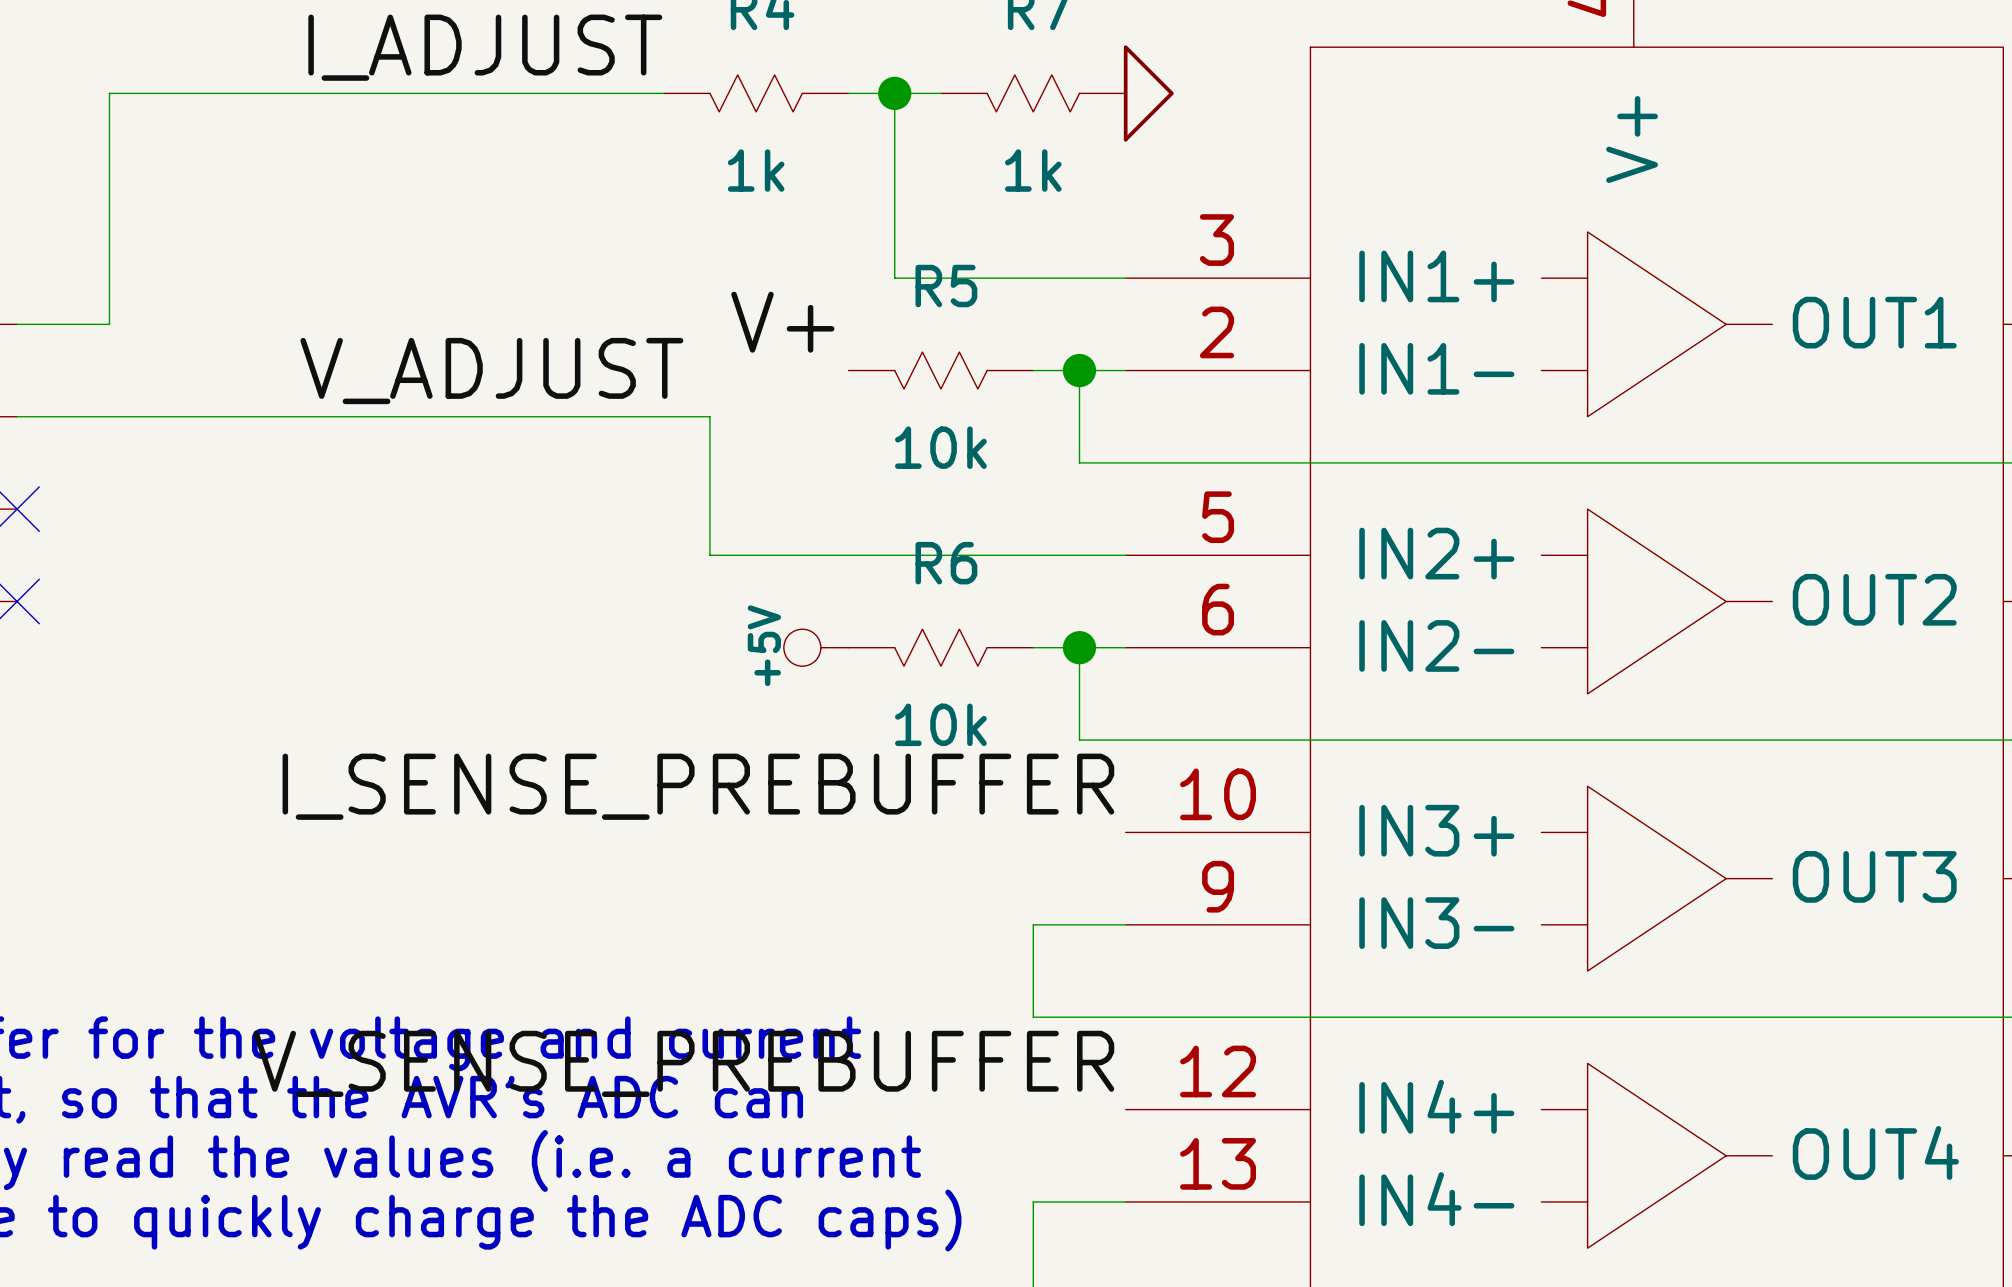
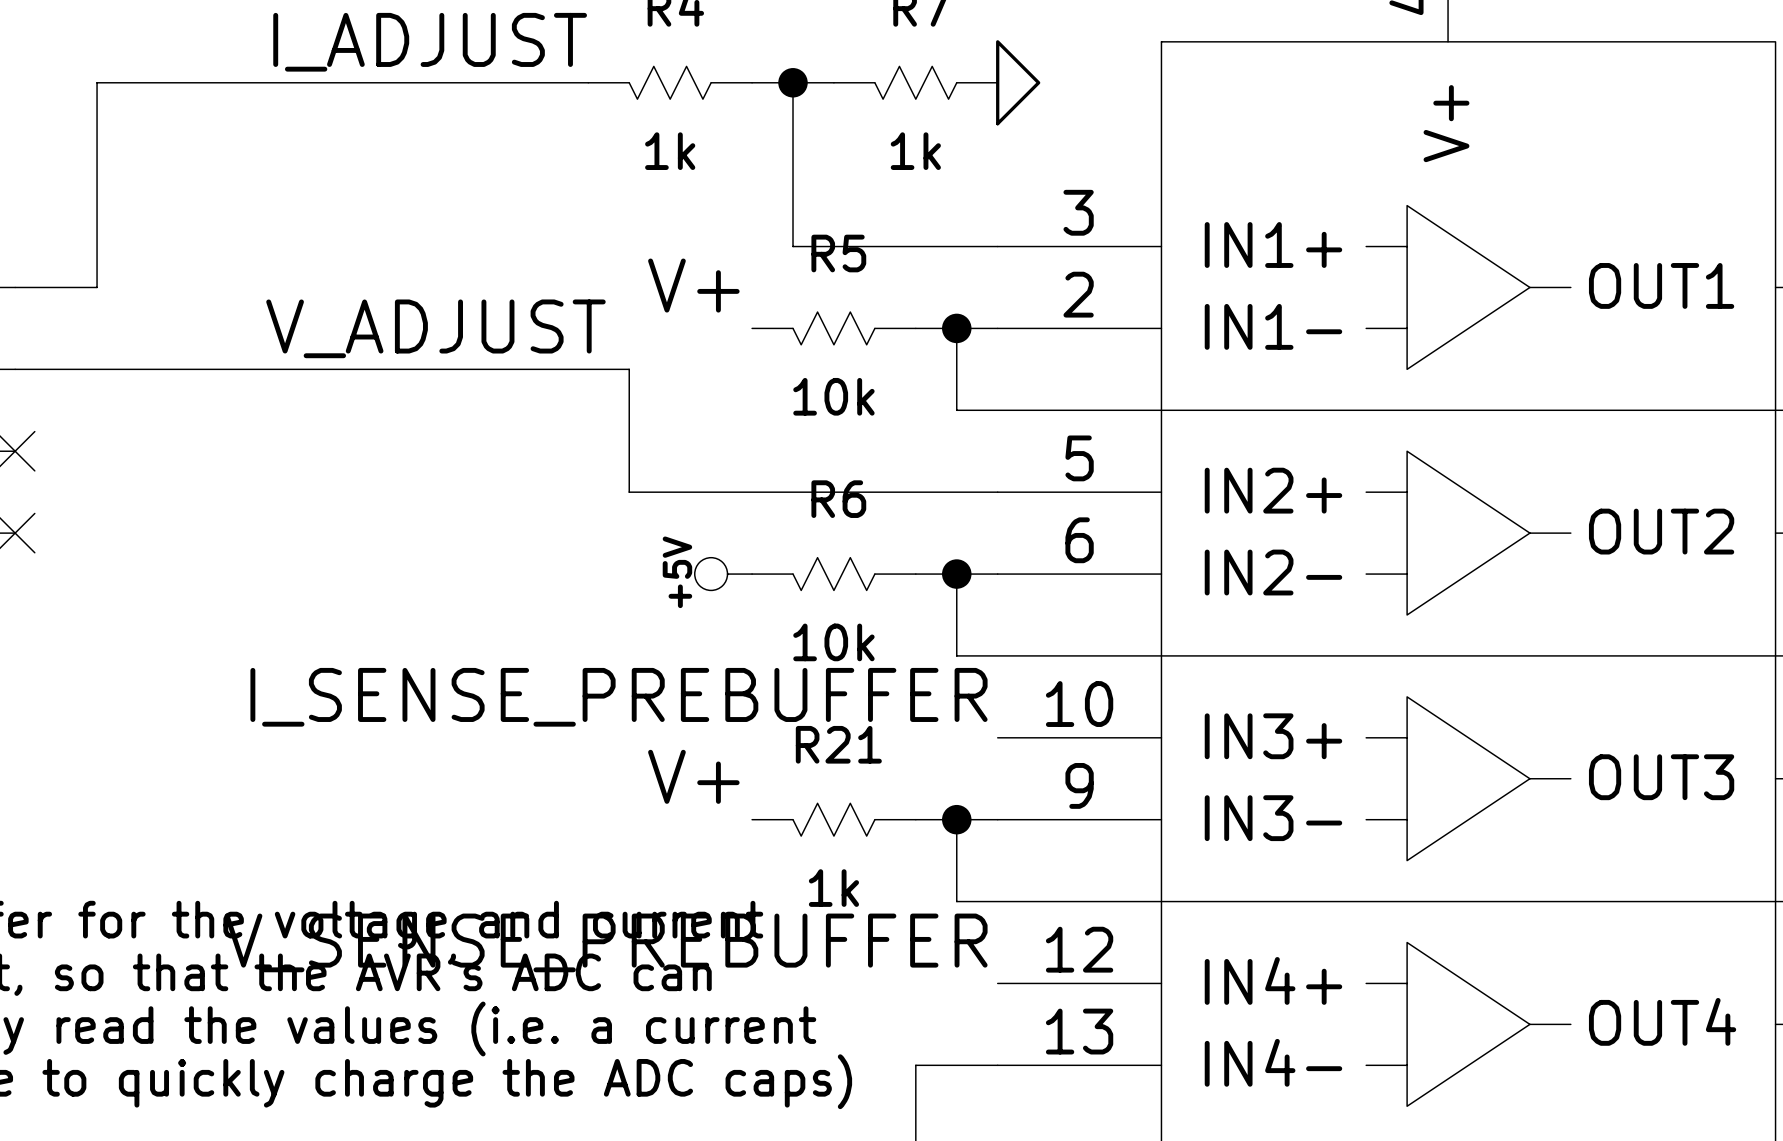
label: none -> V+ (693, 776)
R21: none -> 1k (833, 819)
wire: (1033, 924) (1033, 1017) (1079, 1017) -> (956, 819) (956, 901)
junction: none -> (956, 819)

